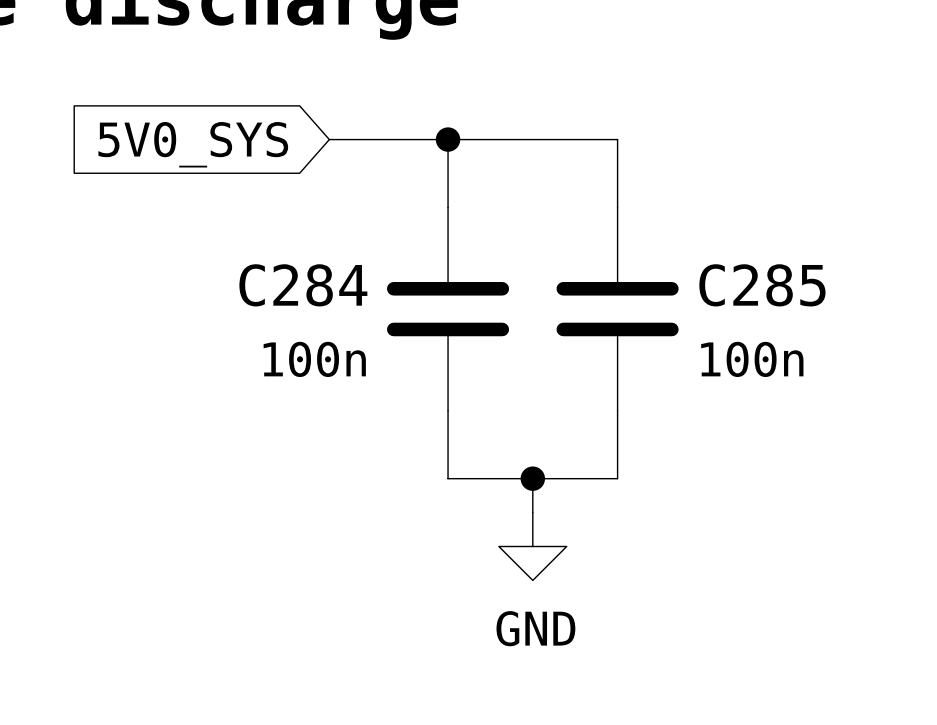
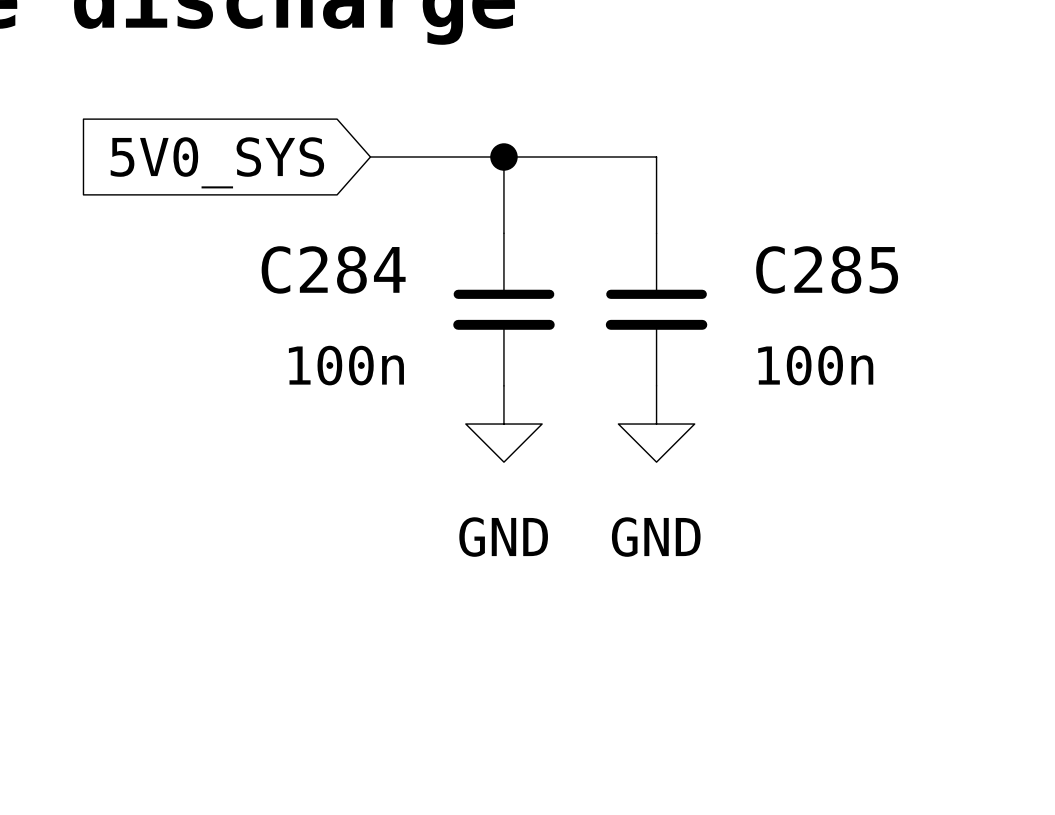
wire: (583, 139) (617, 139) (617, 207) -> (656, 157) (656, 233)
C284 symbol: [386, 207, 510, 411] -> [453, 233, 555, 386]
C285 symbol: [556, 207, 679, 411] -> [605, 233, 708, 386]
power symbol: none -> GND (503, 424)
power symbol: none -> GND (656, 424)
wire: (448, 410) (448, 478) (617, 478) (617, 410) -> none
wire: (532, 478) (532, 512) -> none
junction: (532, 478) -> none
power symbol: GND (532, 546) -> none

